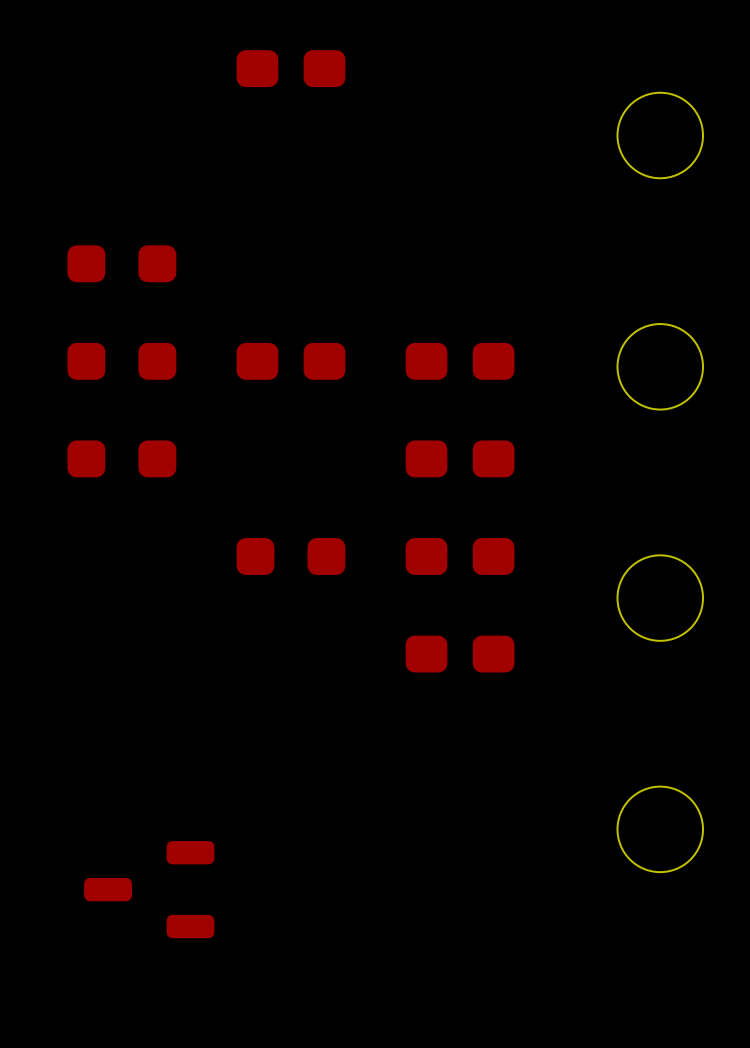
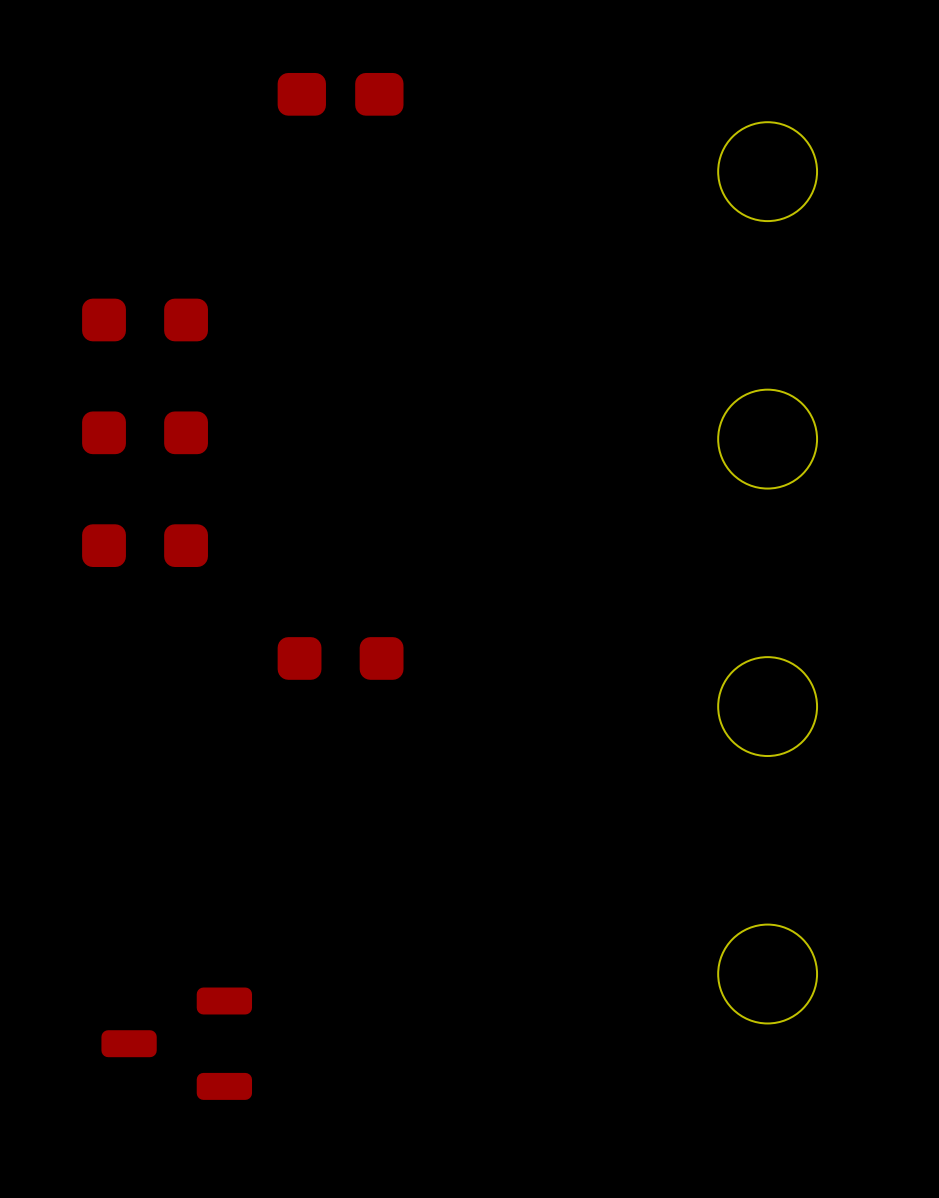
part: (290, 361) -> none
part: (460, 361) -> none
part: (460, 458) -> none
part: (460, 556) -> none
part: (460, 654) -> none

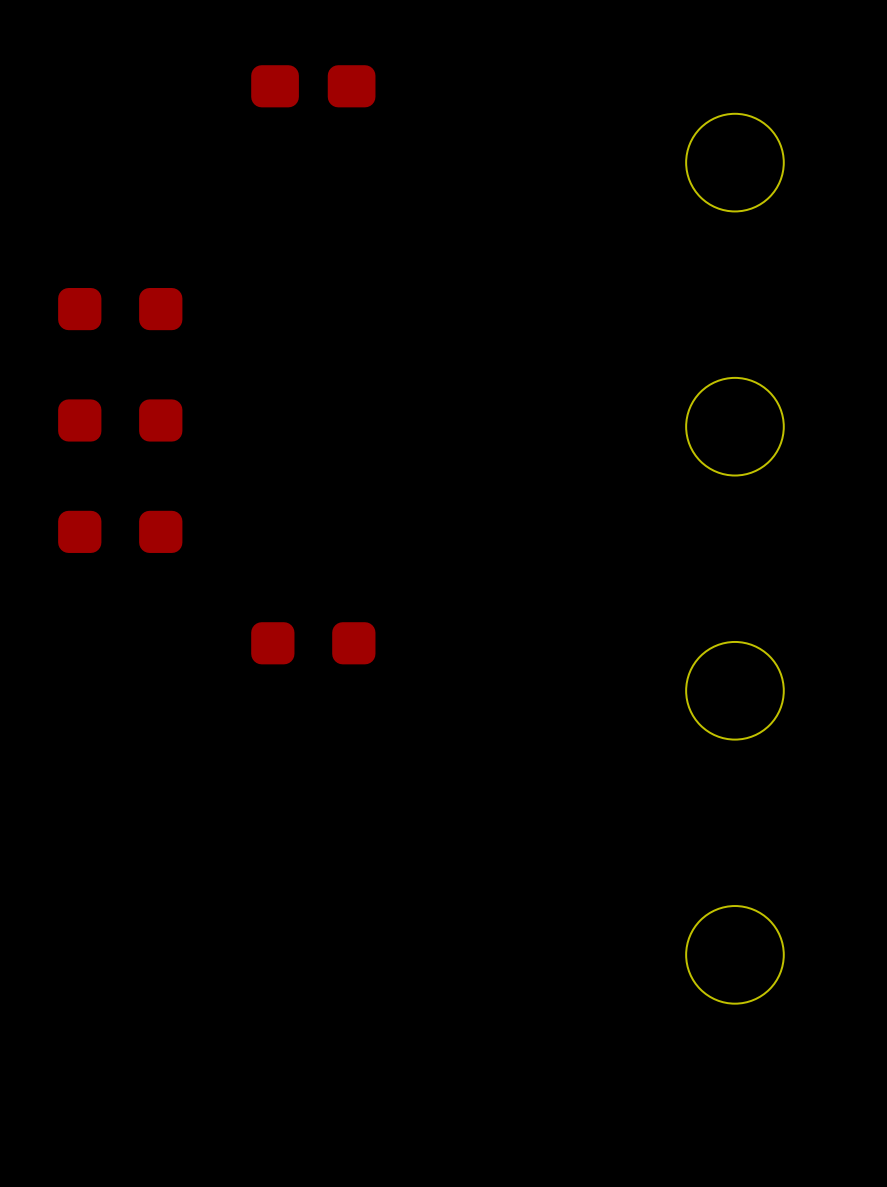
part: (176, 1043) -> none

